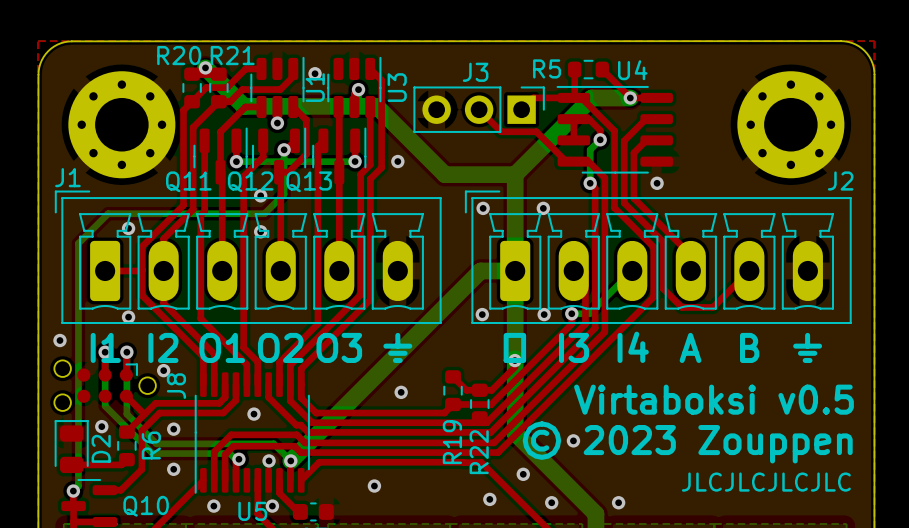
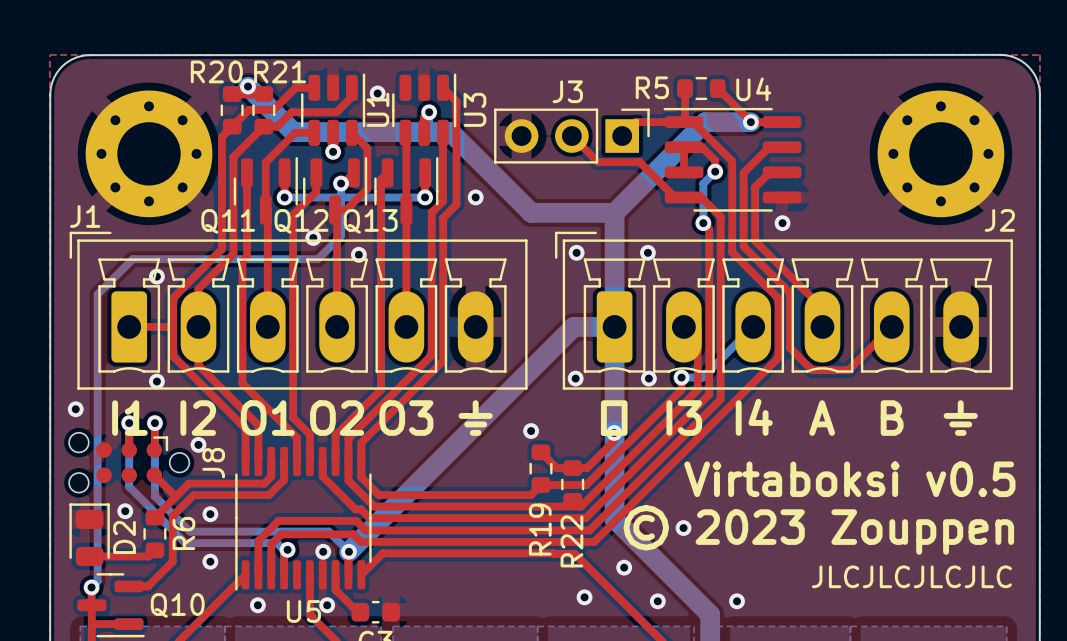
via position: (260, 231) -> (358, 254)
via position: (401, 392) -> (531, 431)
via: (253, 414) -> none
via: (374, 486) -> none

